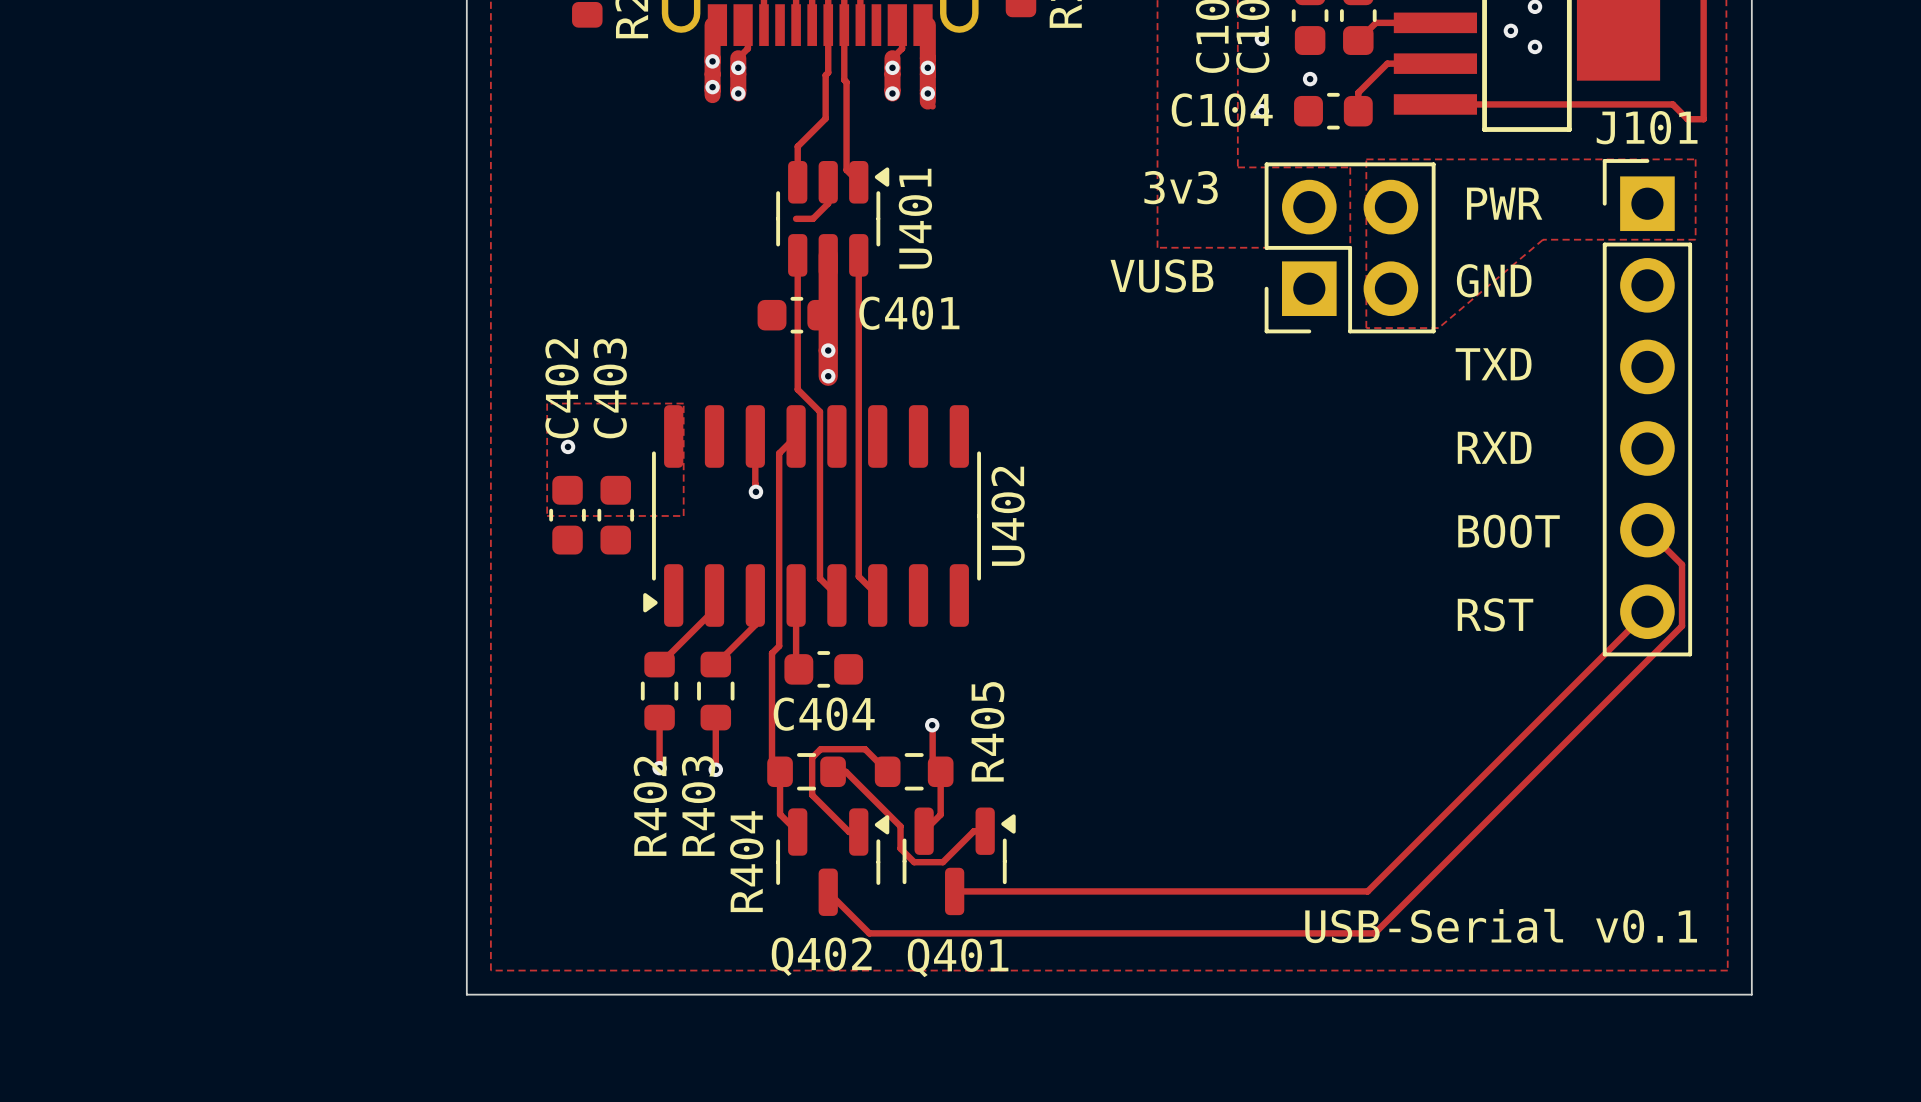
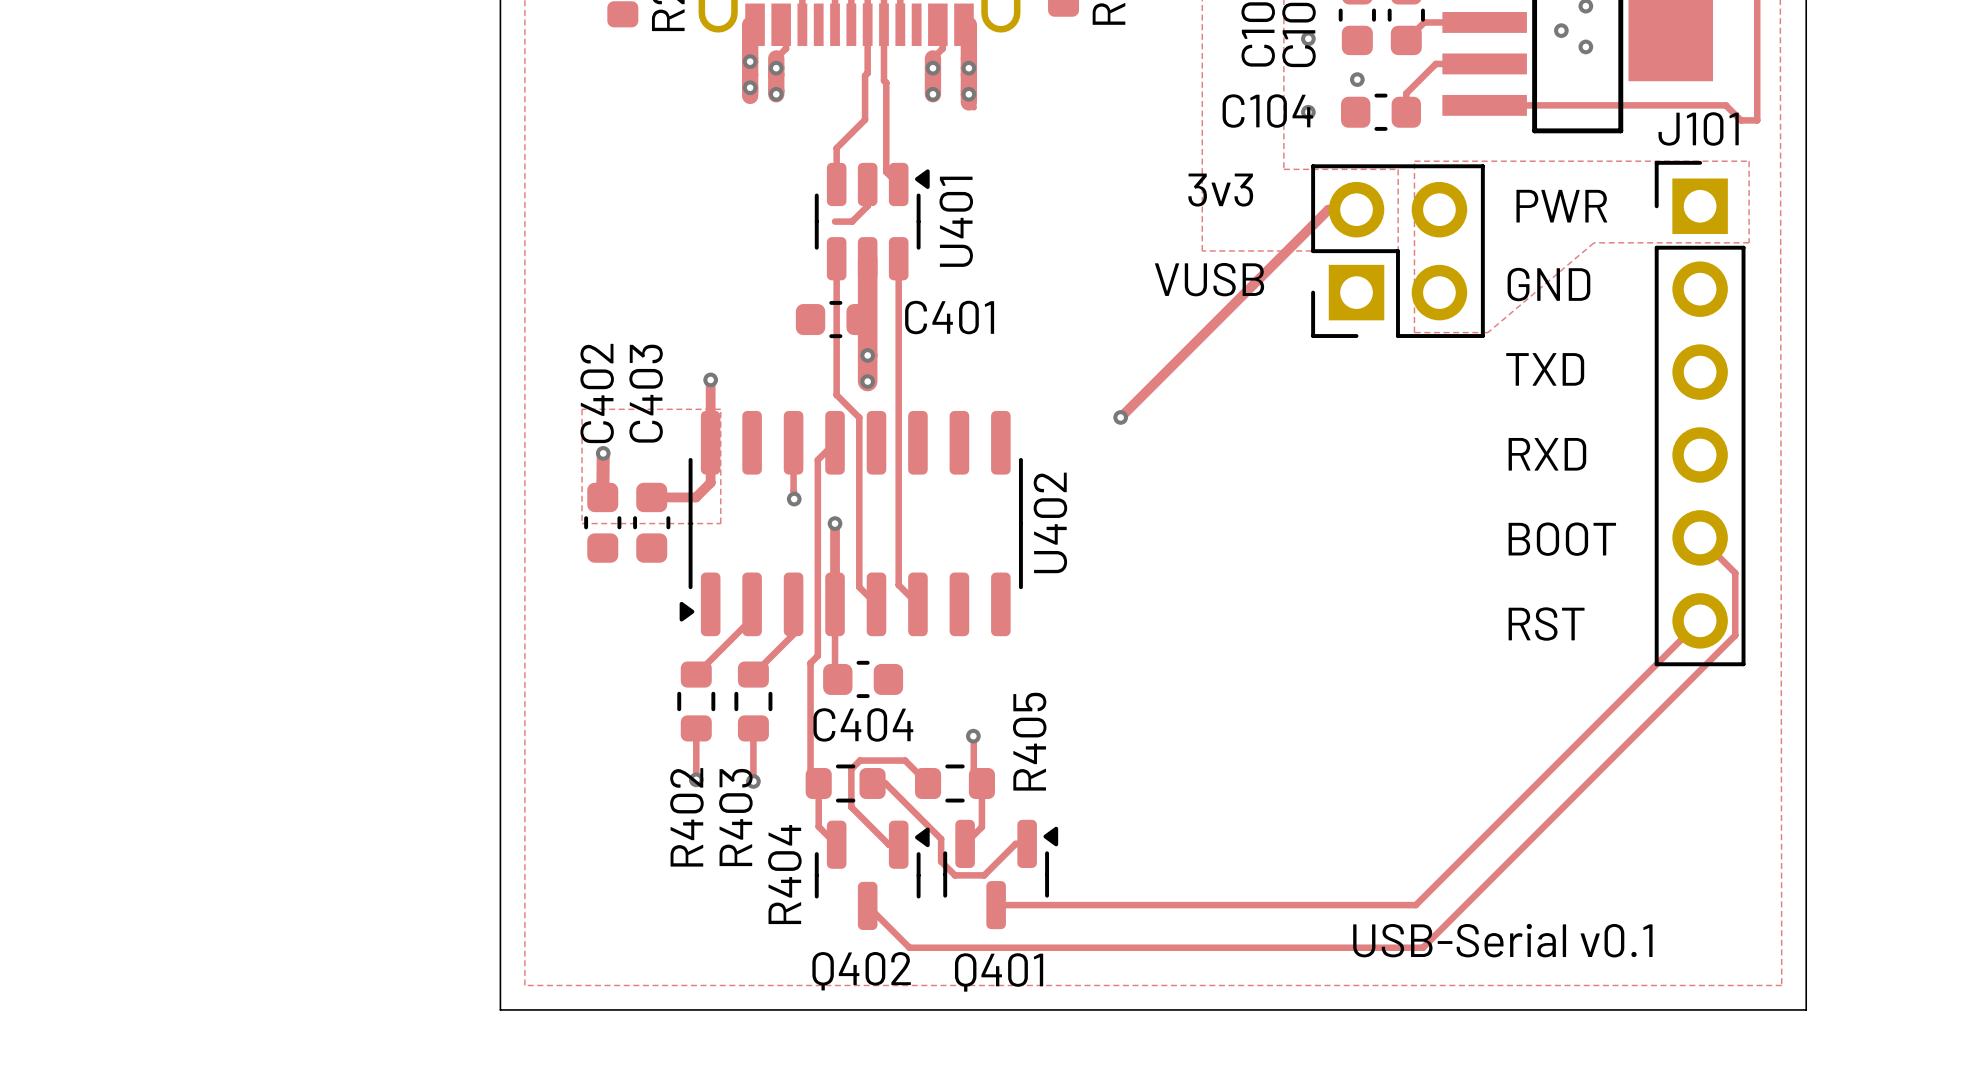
track: none -> (1356, 209) (1328, 209) (1120, 417)
track: none -> (710, 379) (710, 482) (695, 497) (651, 497)
via: none -> (710, 379)
via: none -> (1120, 417)
track: none -> (603, 453) (602, 497)
track: none -> (835, 523) (835, 604)
via: none -> (835, 523)

